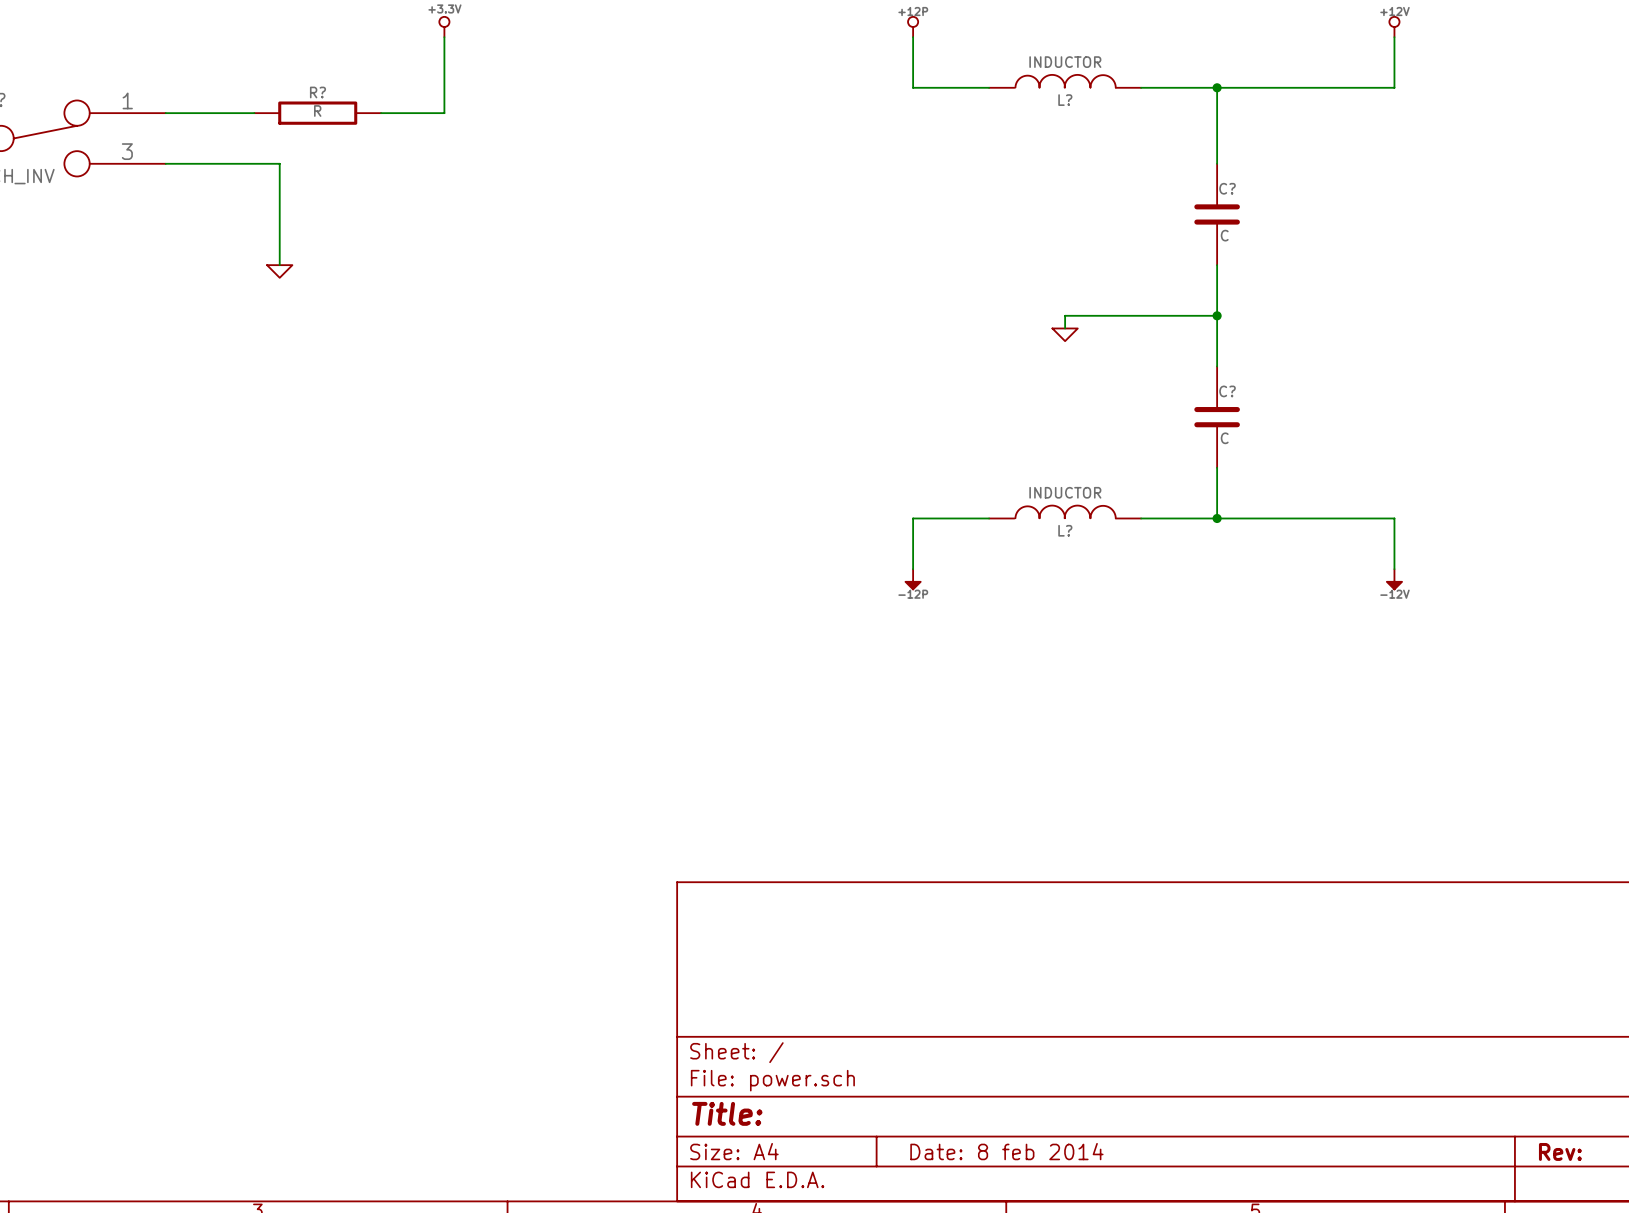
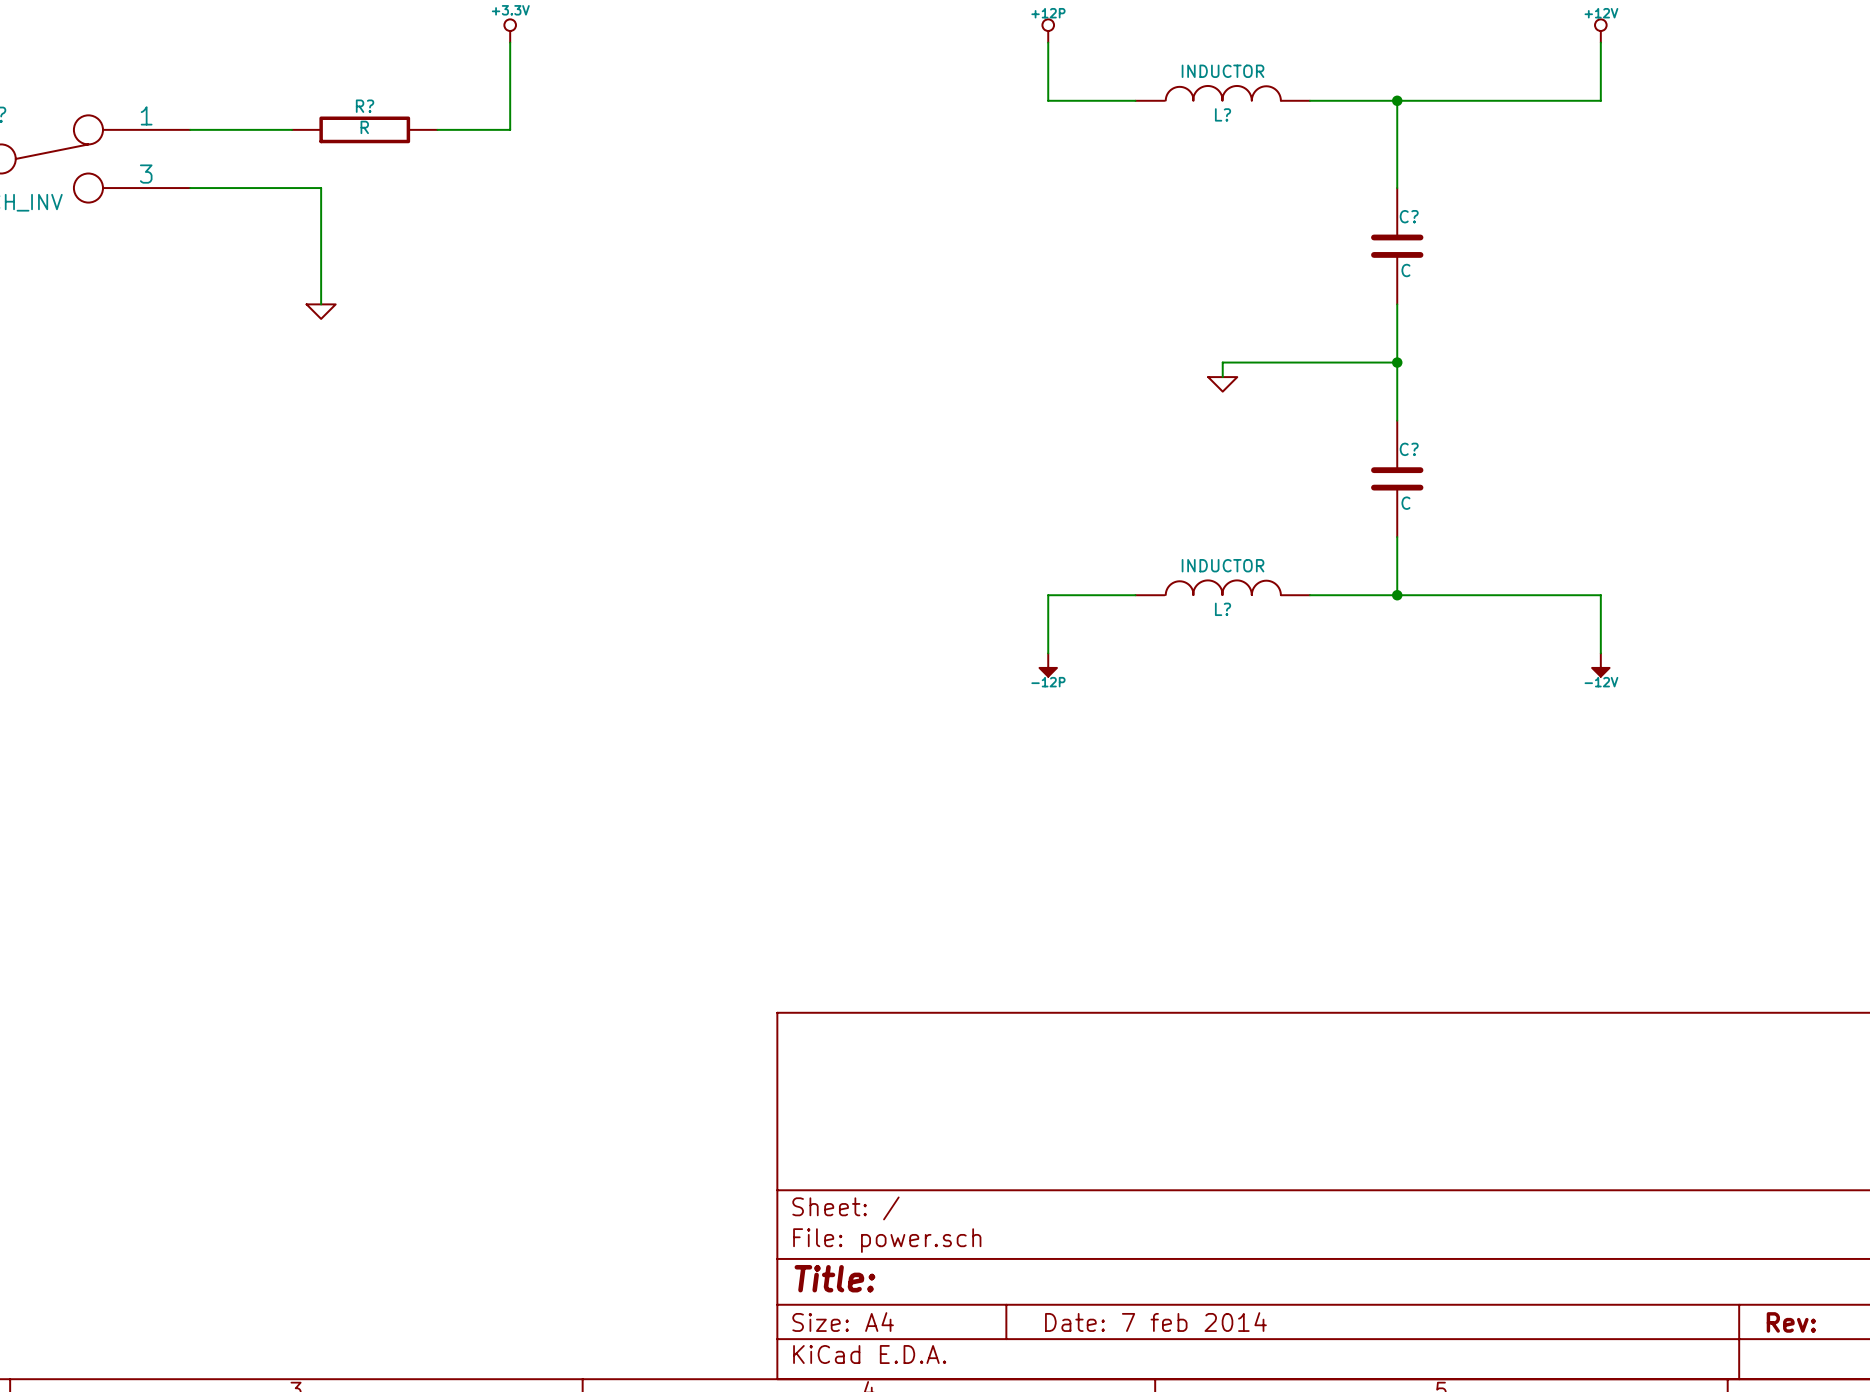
title block: Date: 8 feb 2014 (1006, 1151) -> Date: 7 feb 2014 (1155, 1322)

